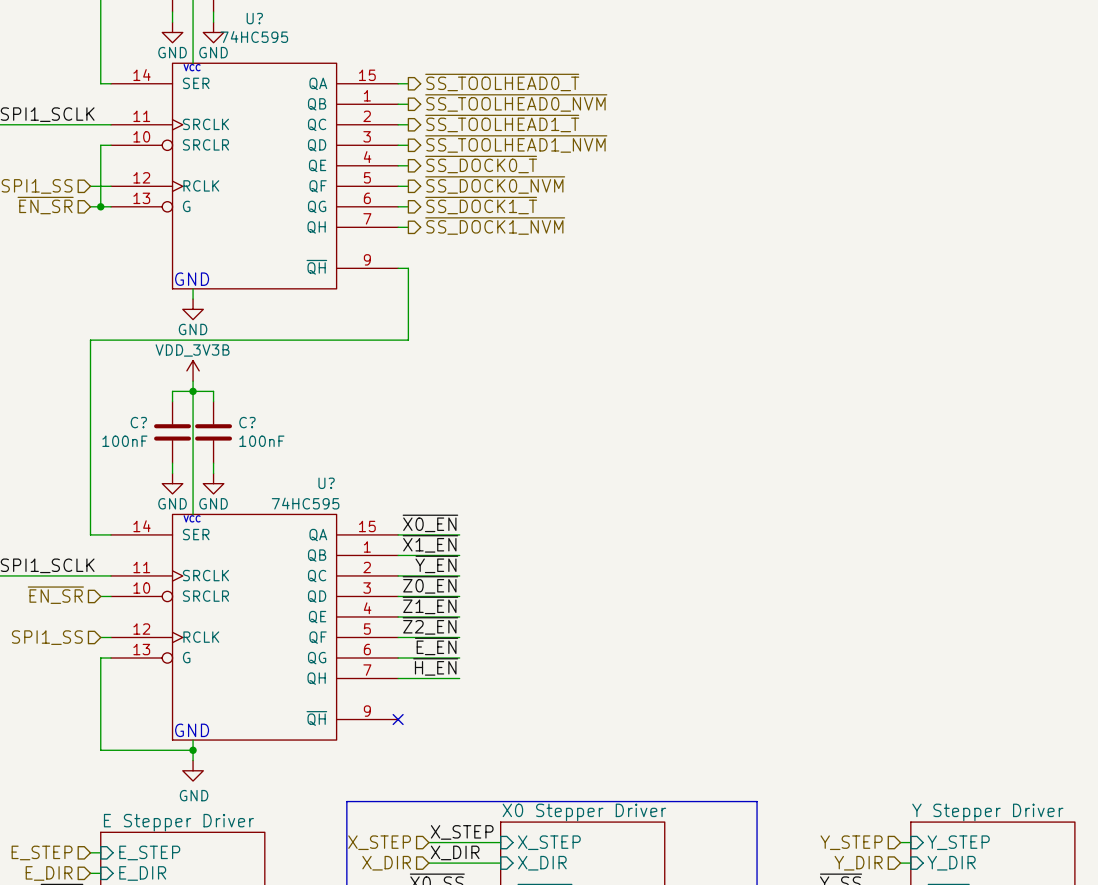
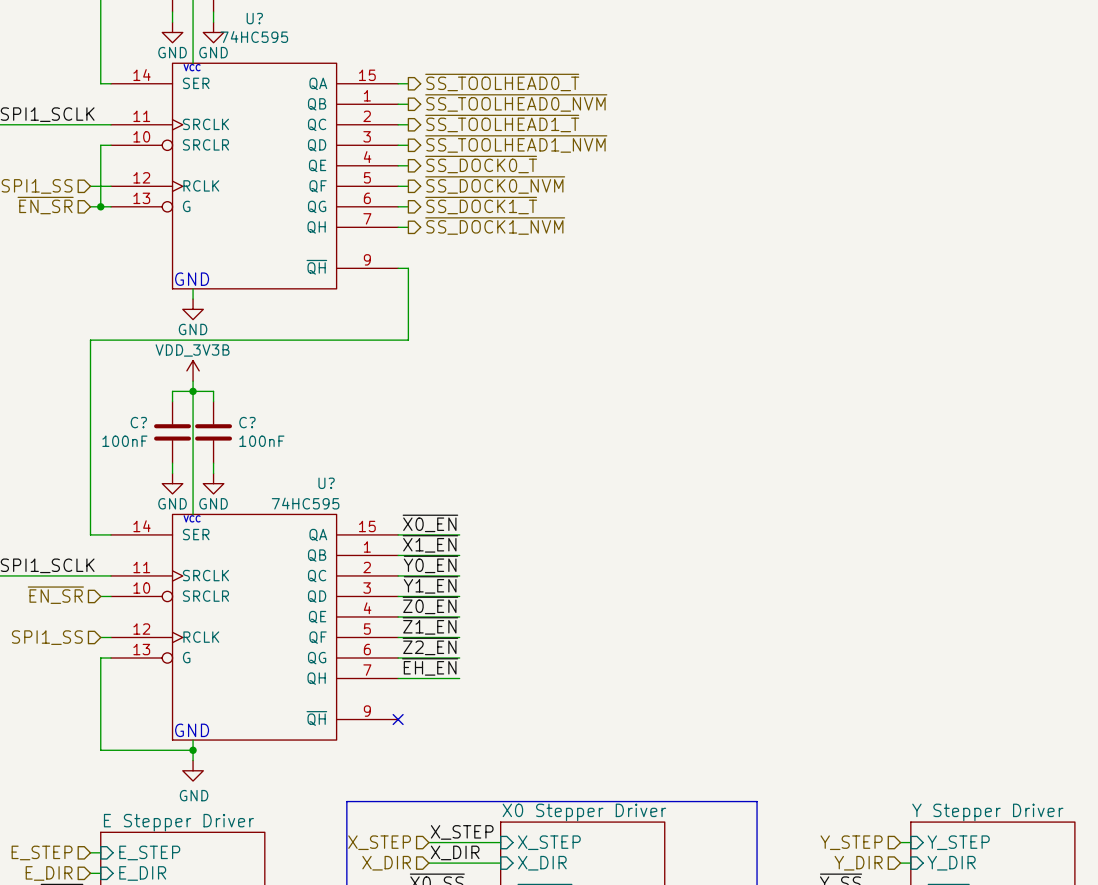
label: ~{Y_EN} (436, 564) -> ~{Y0_EN} (430, 564)
label: ~{Z0_EN} (430, 584) -> ~{Y1_EN} (430, 584)
label: ~{Z1_EN} (430, 605) -> ~{Z0_EN} (430, 605)
label: ~{Z2_EN} (430, 625) -> ~{Z1_EN} (430, 625)
label: ~{E_EN} (436, 646) -> ~{Z2_EN} (430, 646)
label: ~{H_EN} (435, 666) -> ~{EH_EN} (430, 666)

